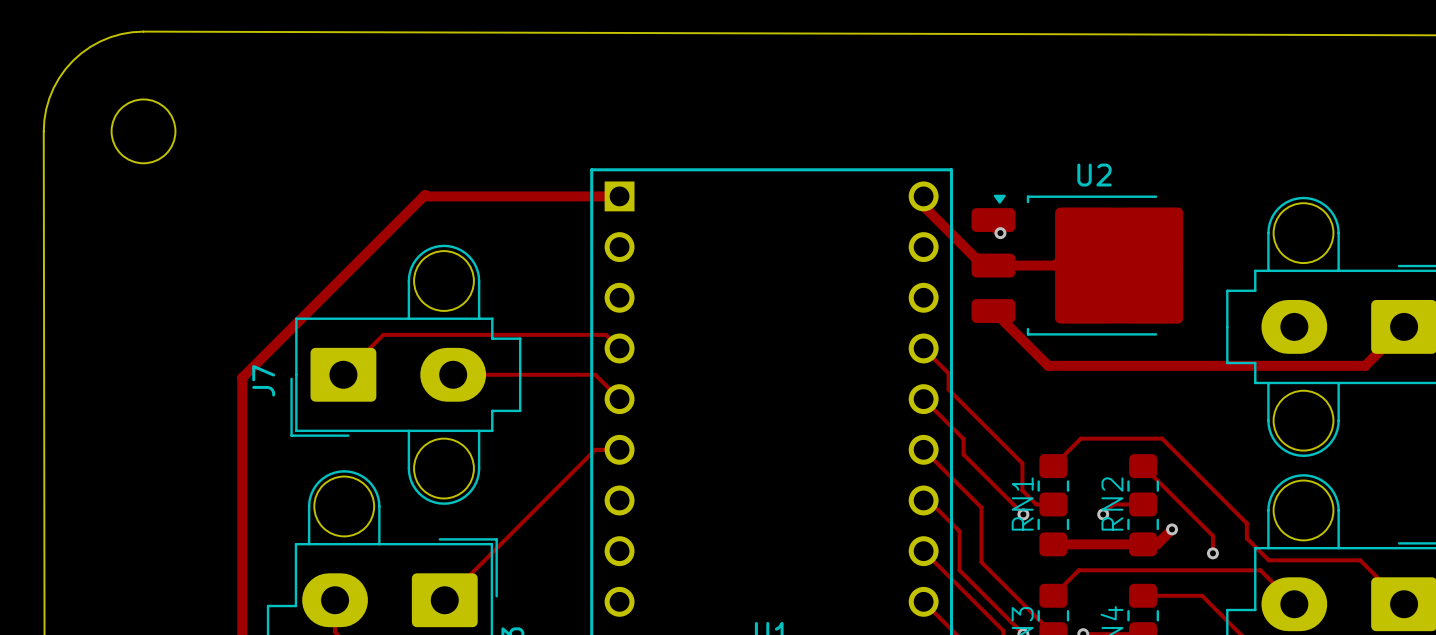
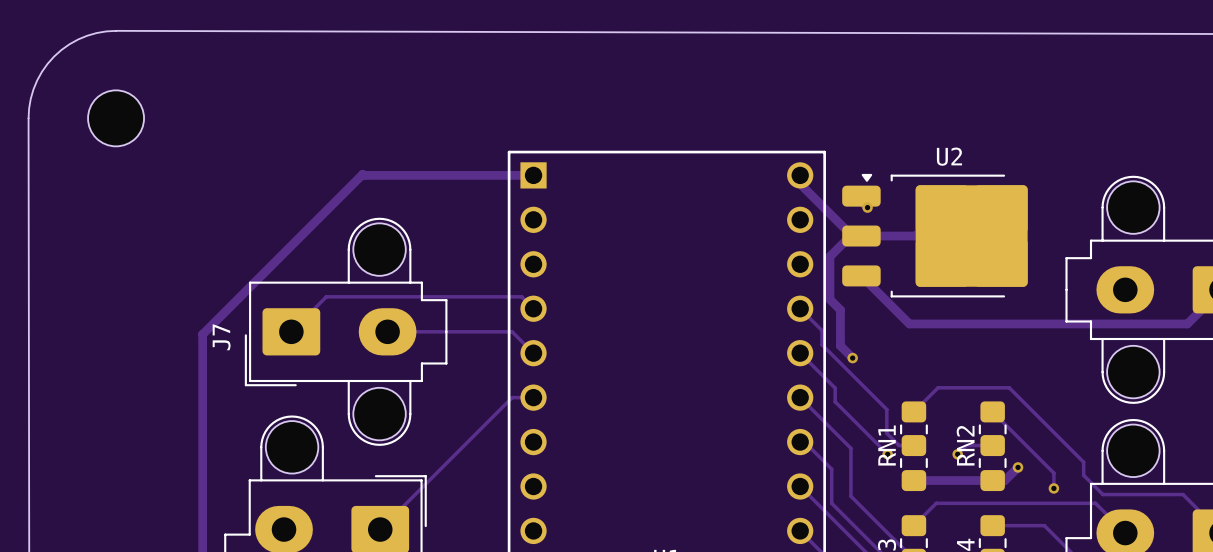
track: none -> (850, 236) (829, 256) (829, 299) (840, 309) (840, 345) (852, 358)
via: none -> (852, 358)

